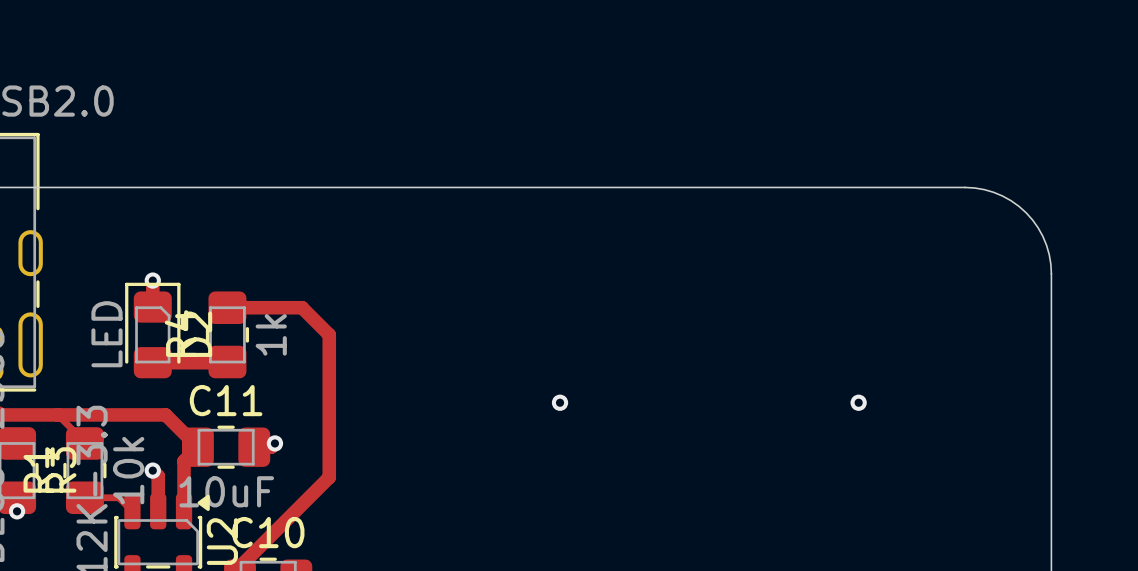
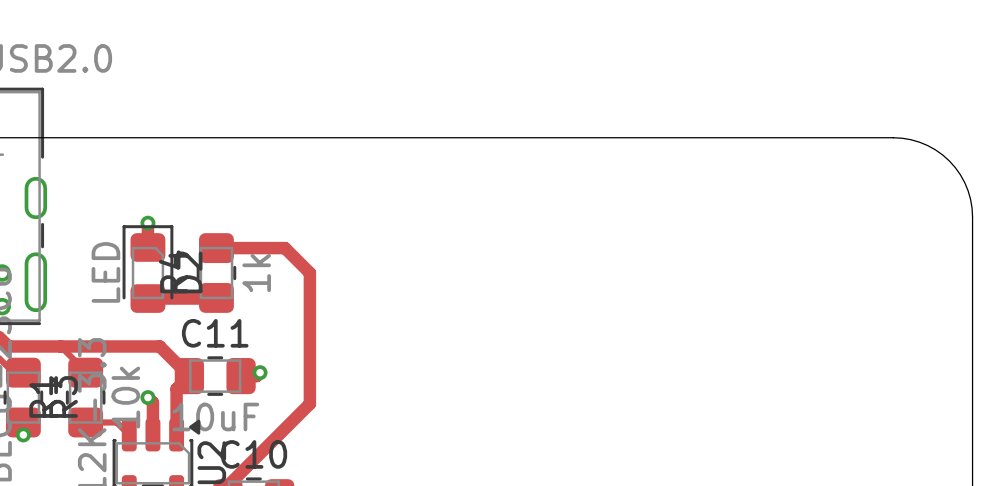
via: (560, 402) -> none
via: (858, 402) -> none

